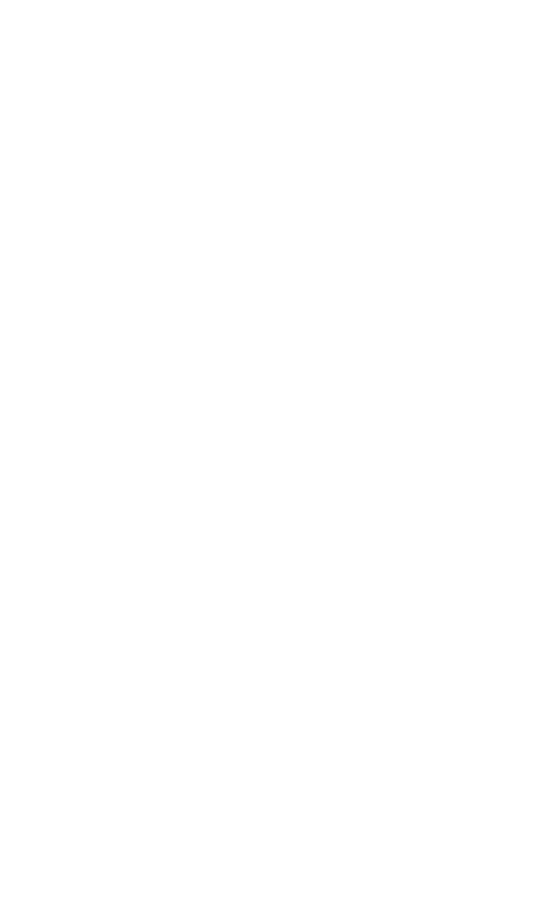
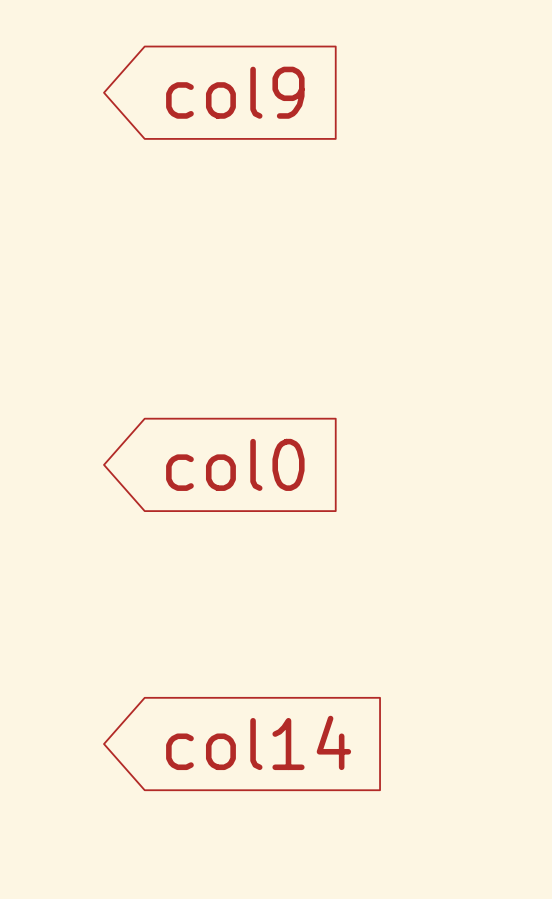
global label: none -> col9 (235, 92)
global label: none -> col0 (235, 464)
global label: none -> col14 (258, 742)

